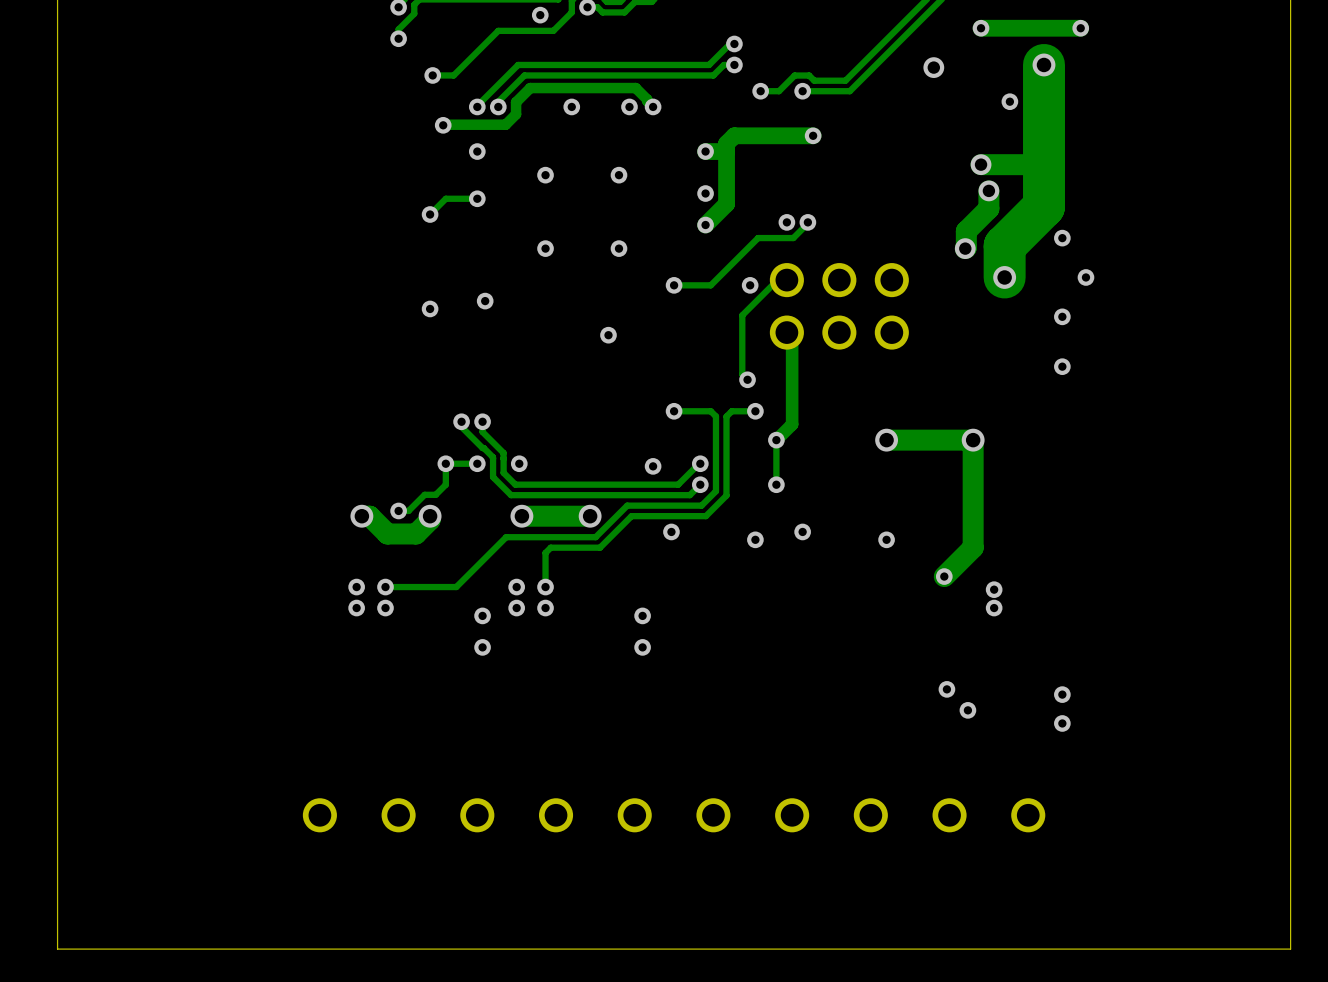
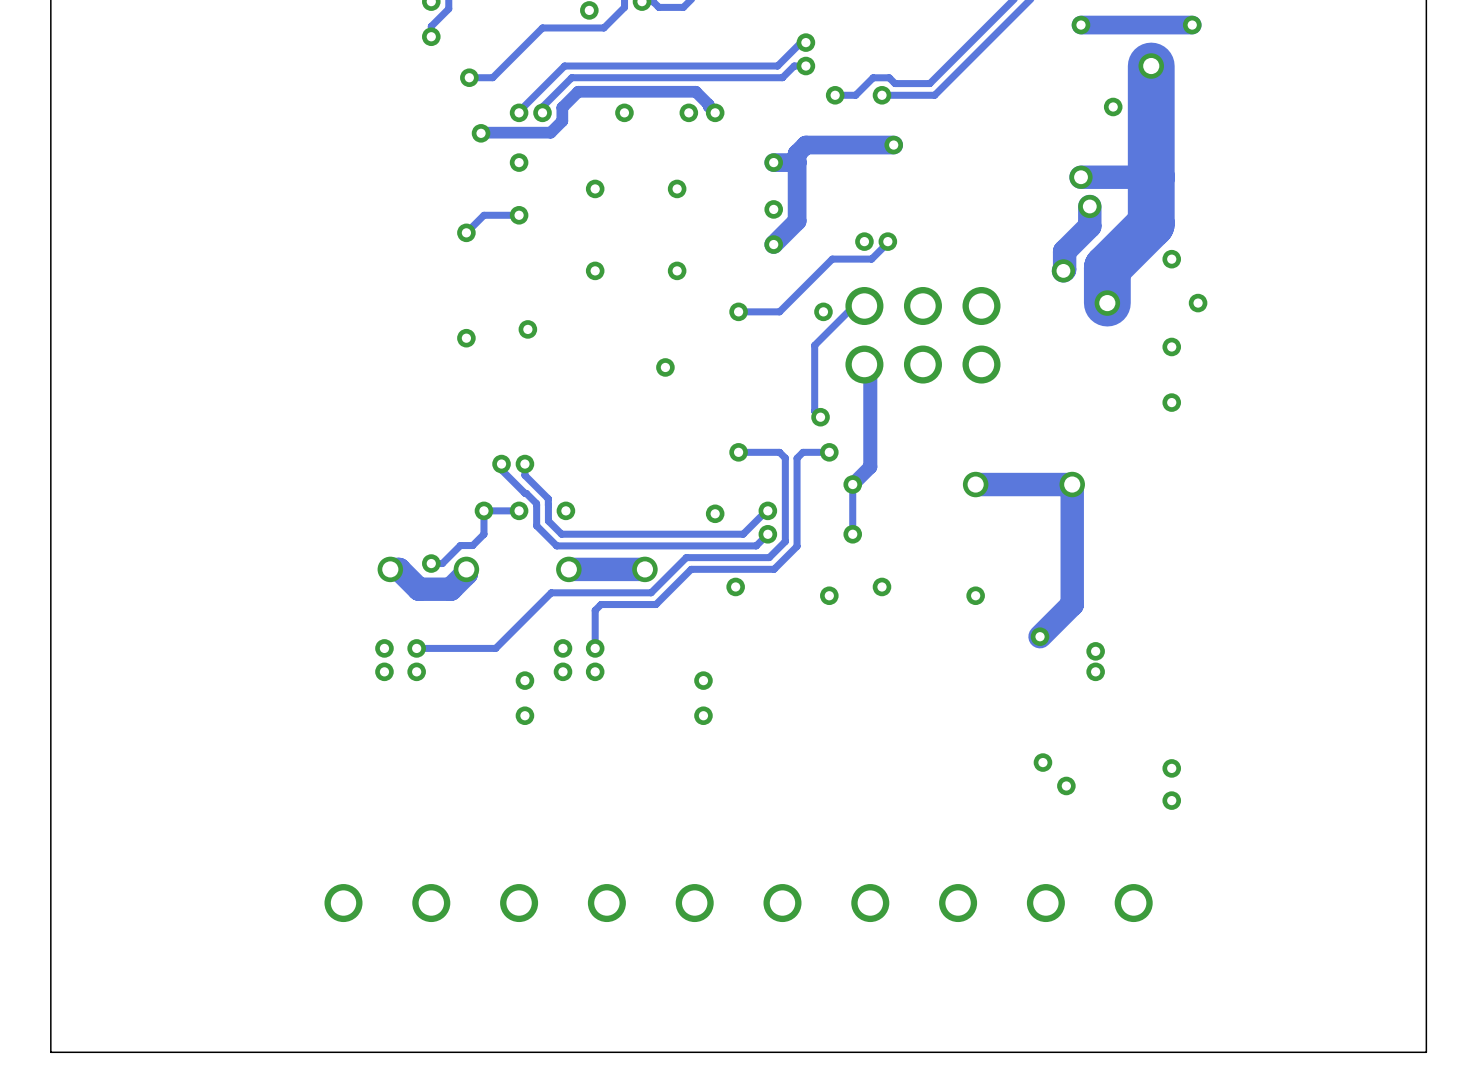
via: (933, 67) -> none

